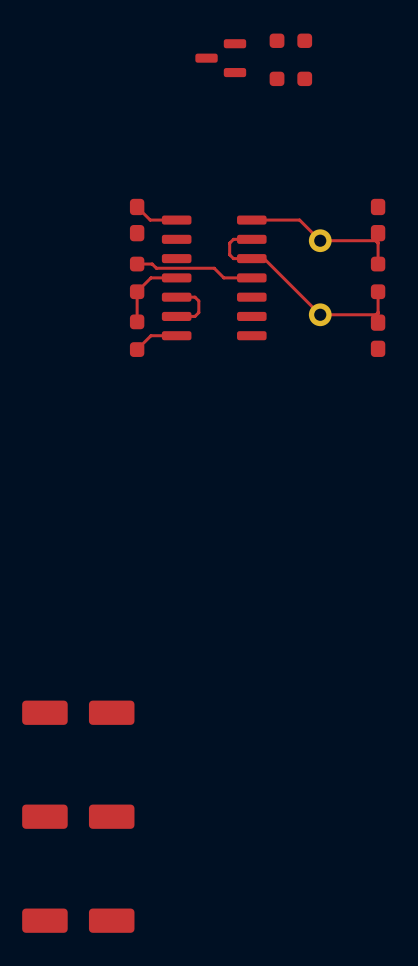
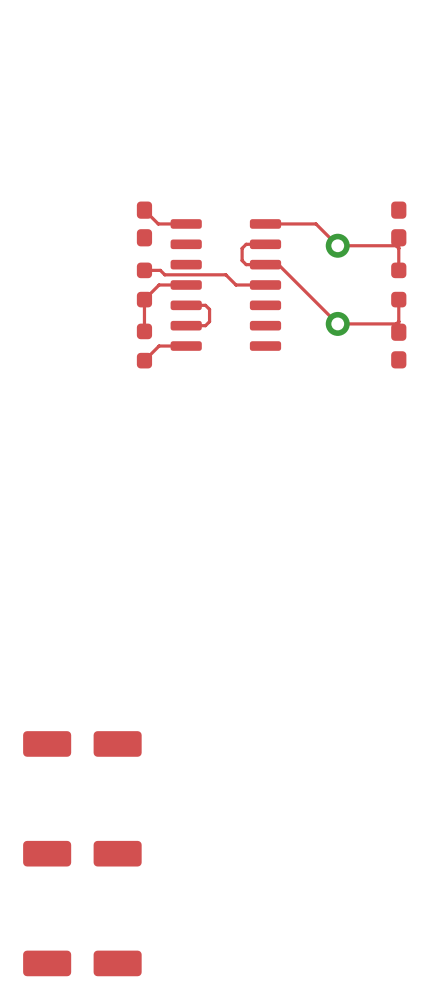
part: (290, 40) -> none
part: (220, 58) -> none
part: (290, 78) -> none

